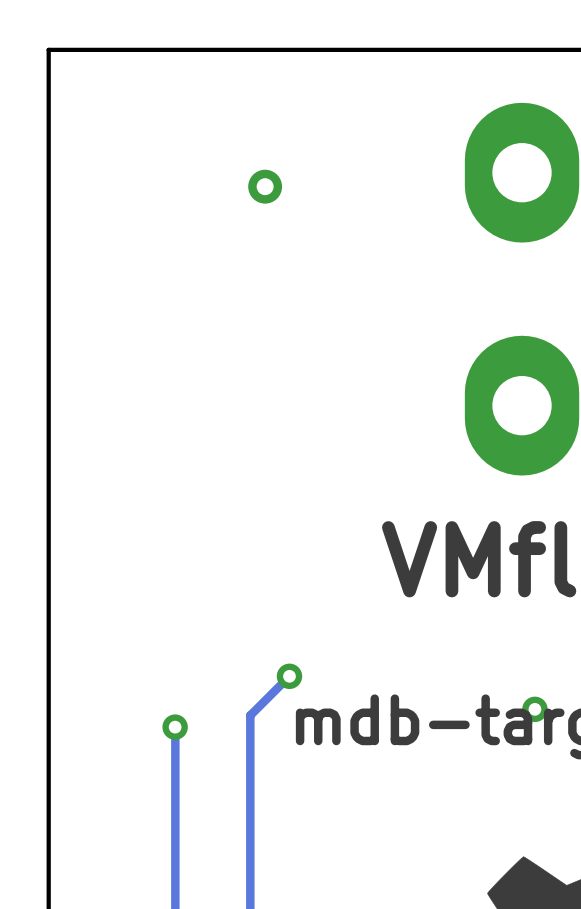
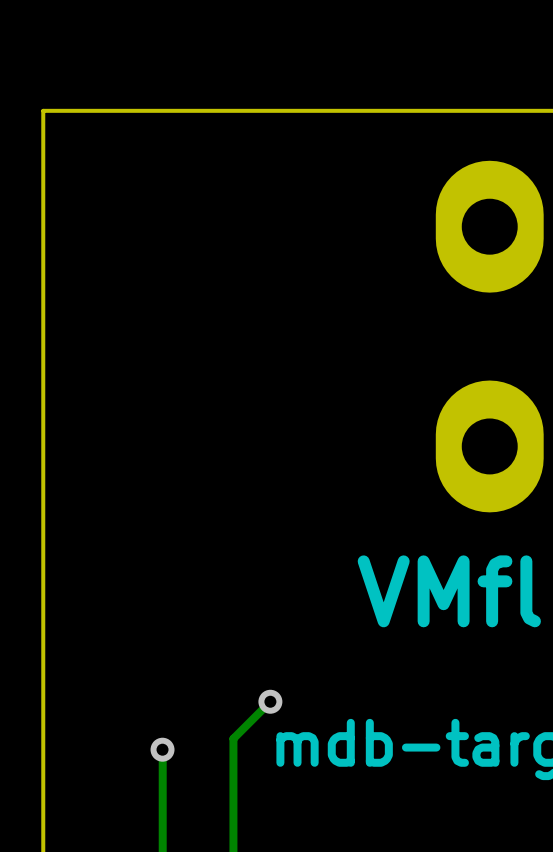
via: (265, 186) -> none
via: (534, 709) -> none

